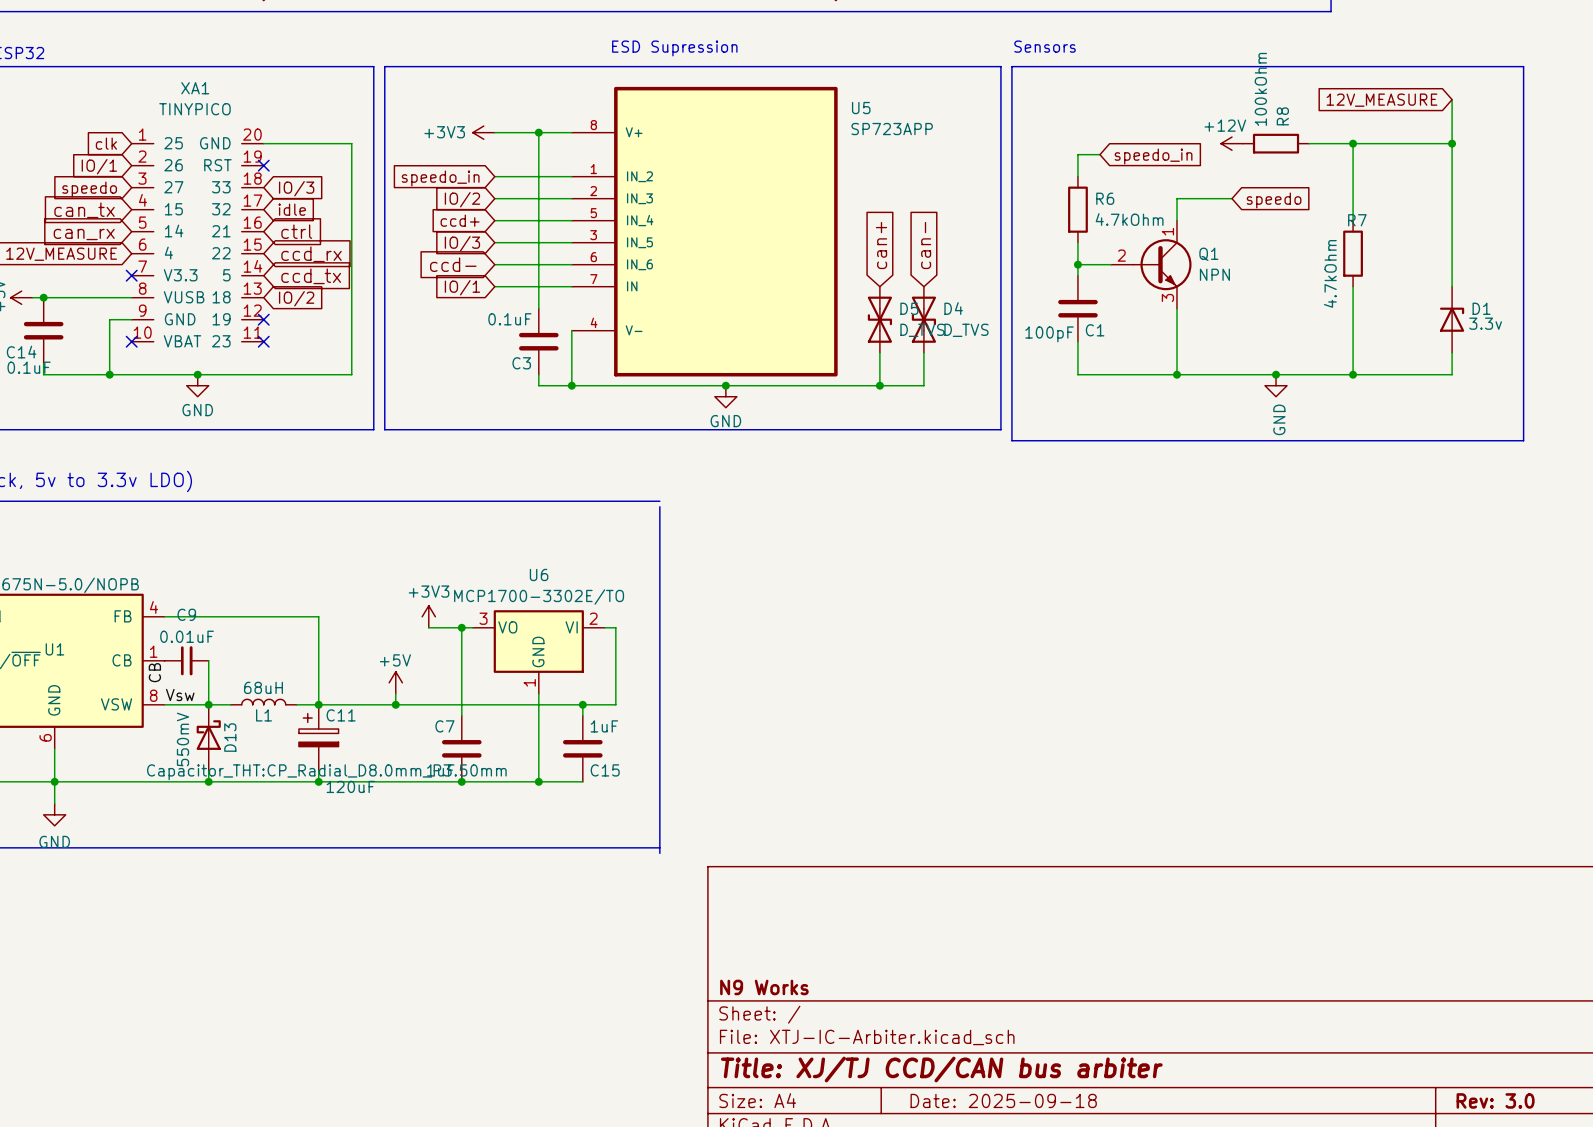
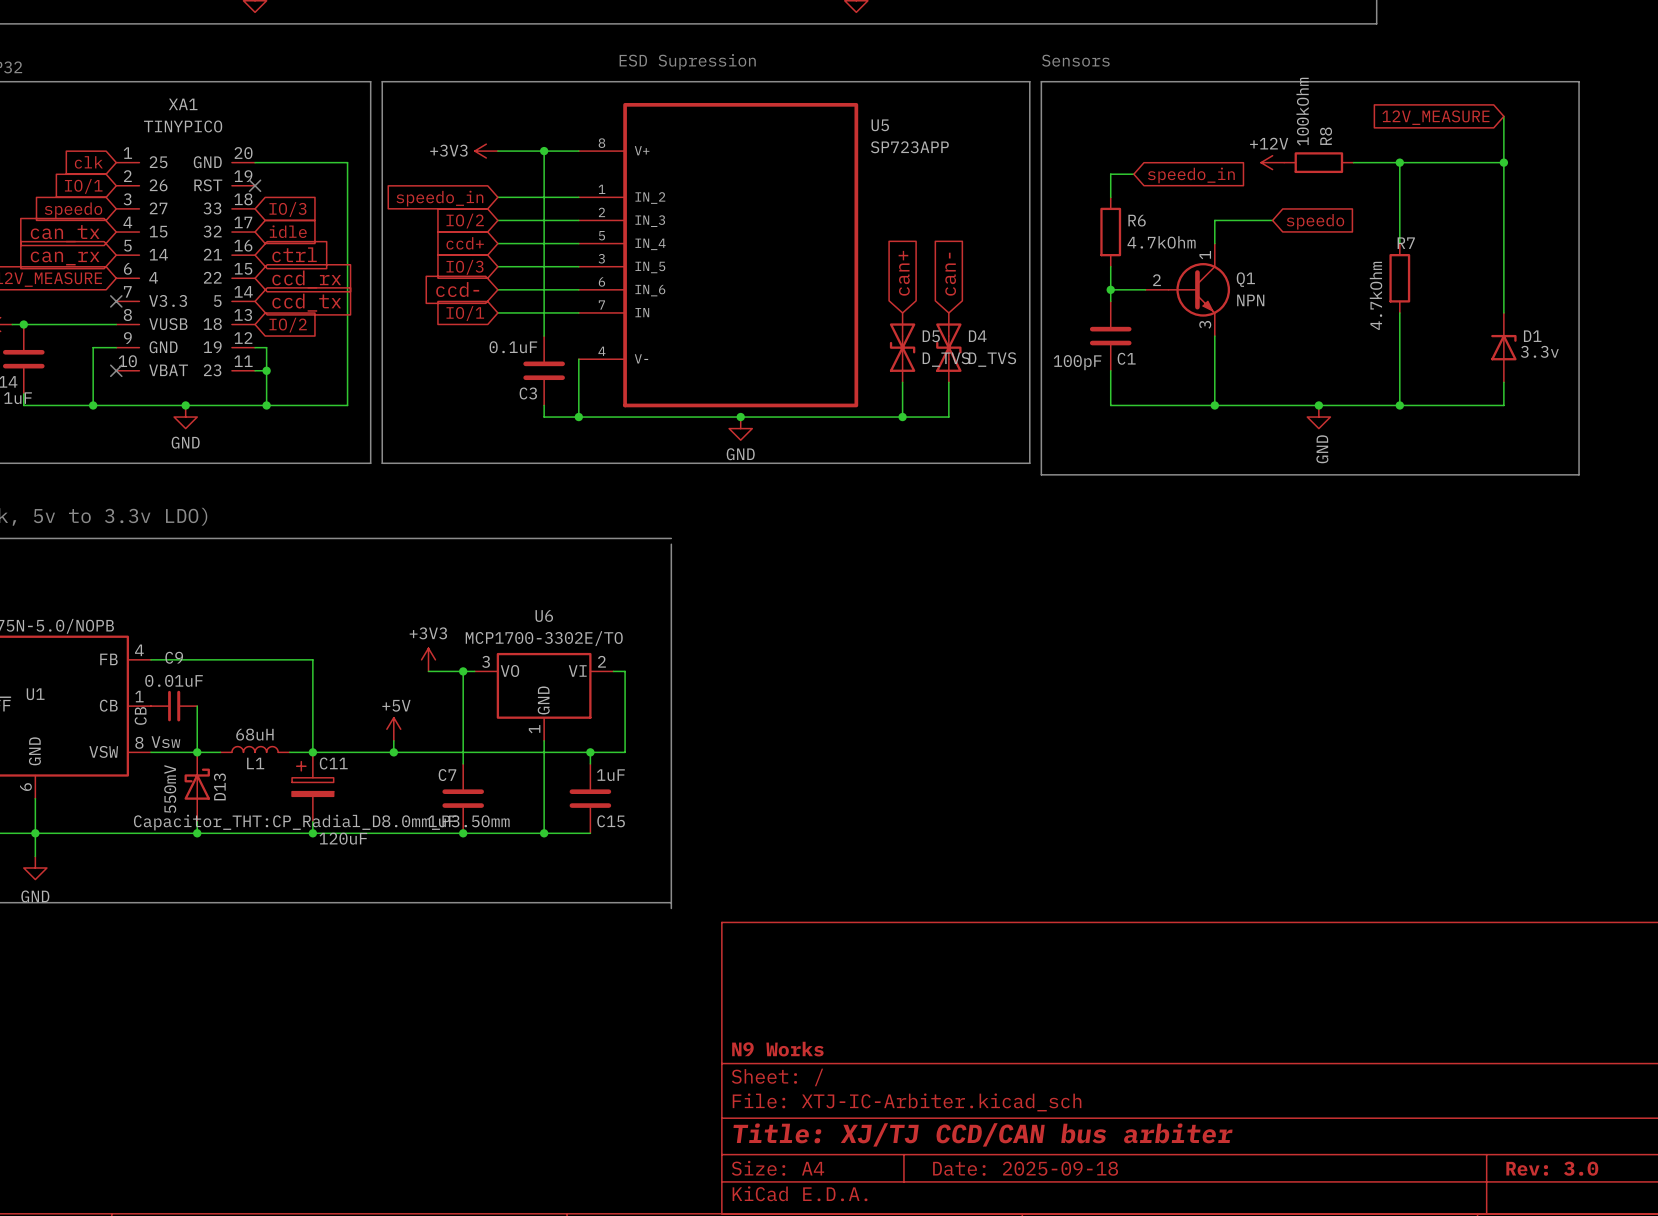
wire: none -> (255, 347) (266, 347) (266, 405)
no-connect mark: (263, 319) -> none
wire: none -> (255, 370) (266, 370)
no-connect mark: (263, 341) -> none
junction: none -> (266, 370)
junction: none -> (266, 405)

